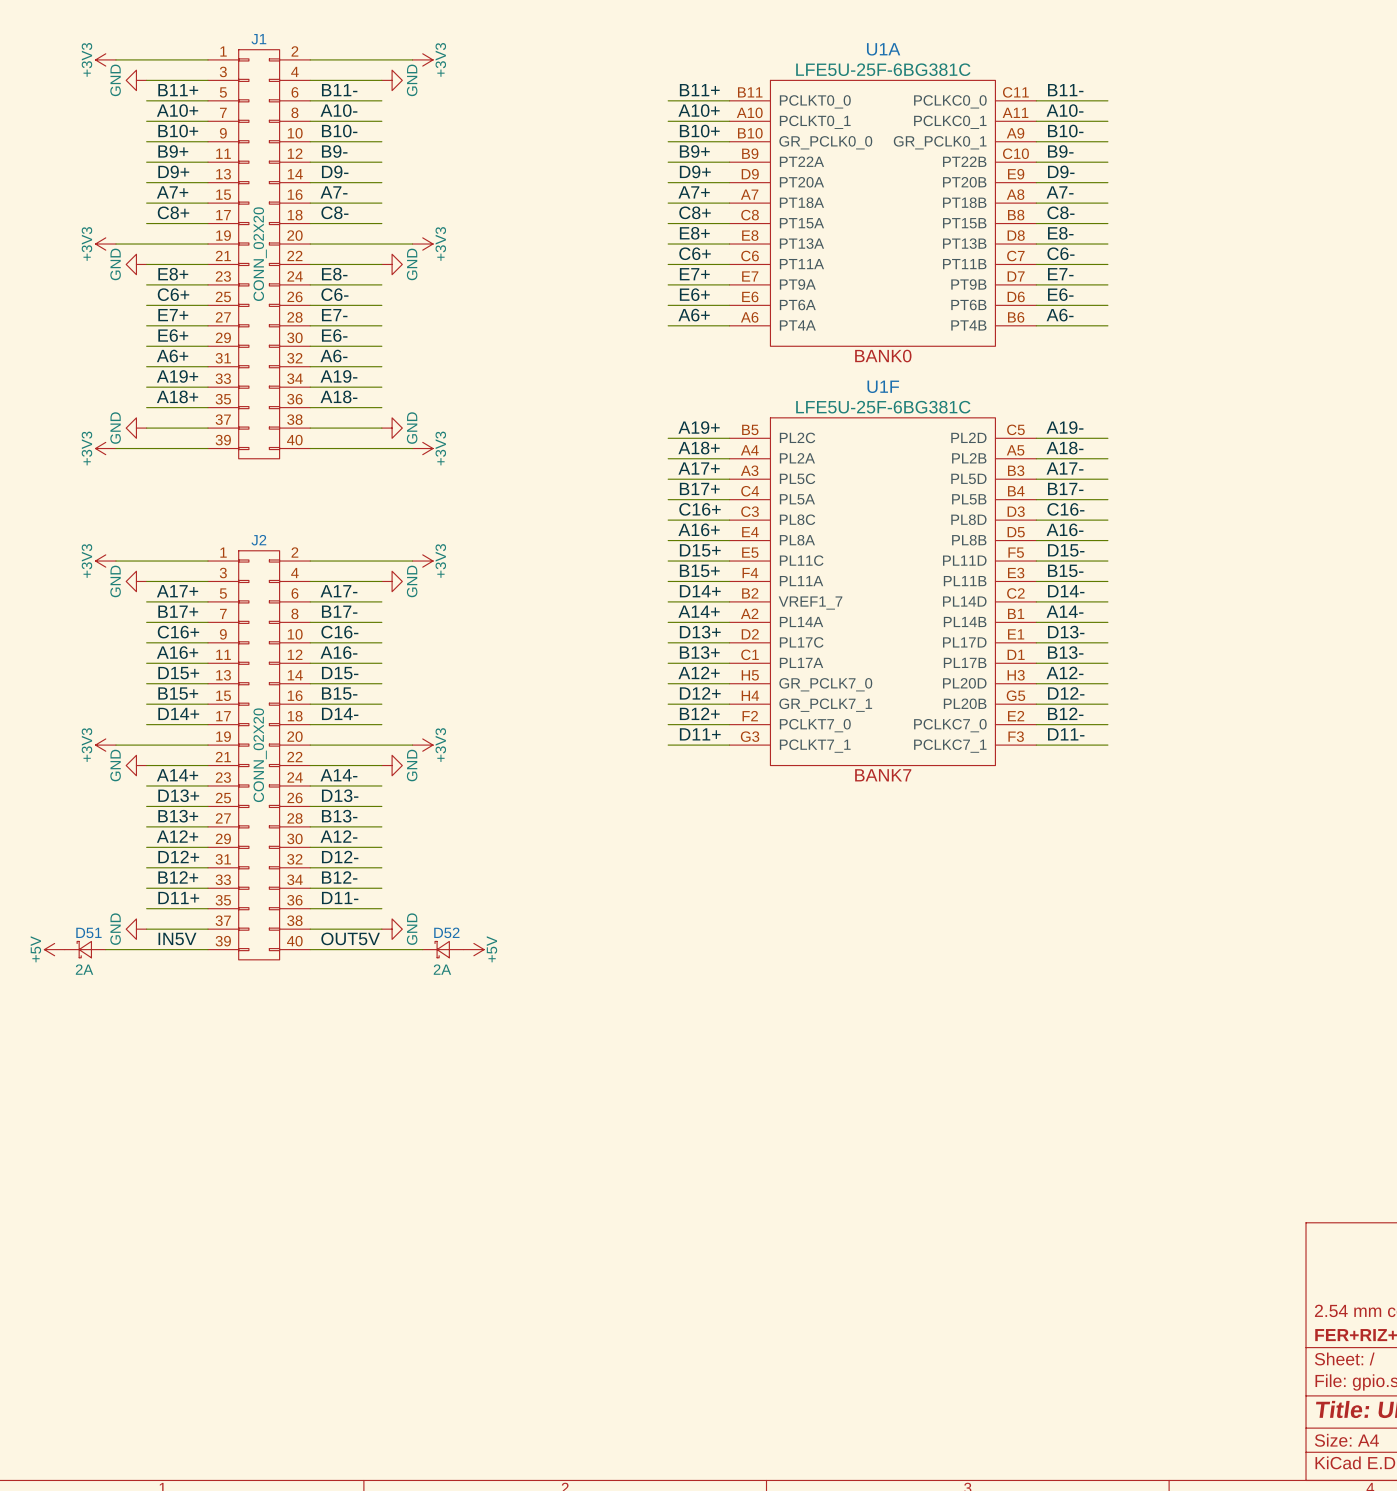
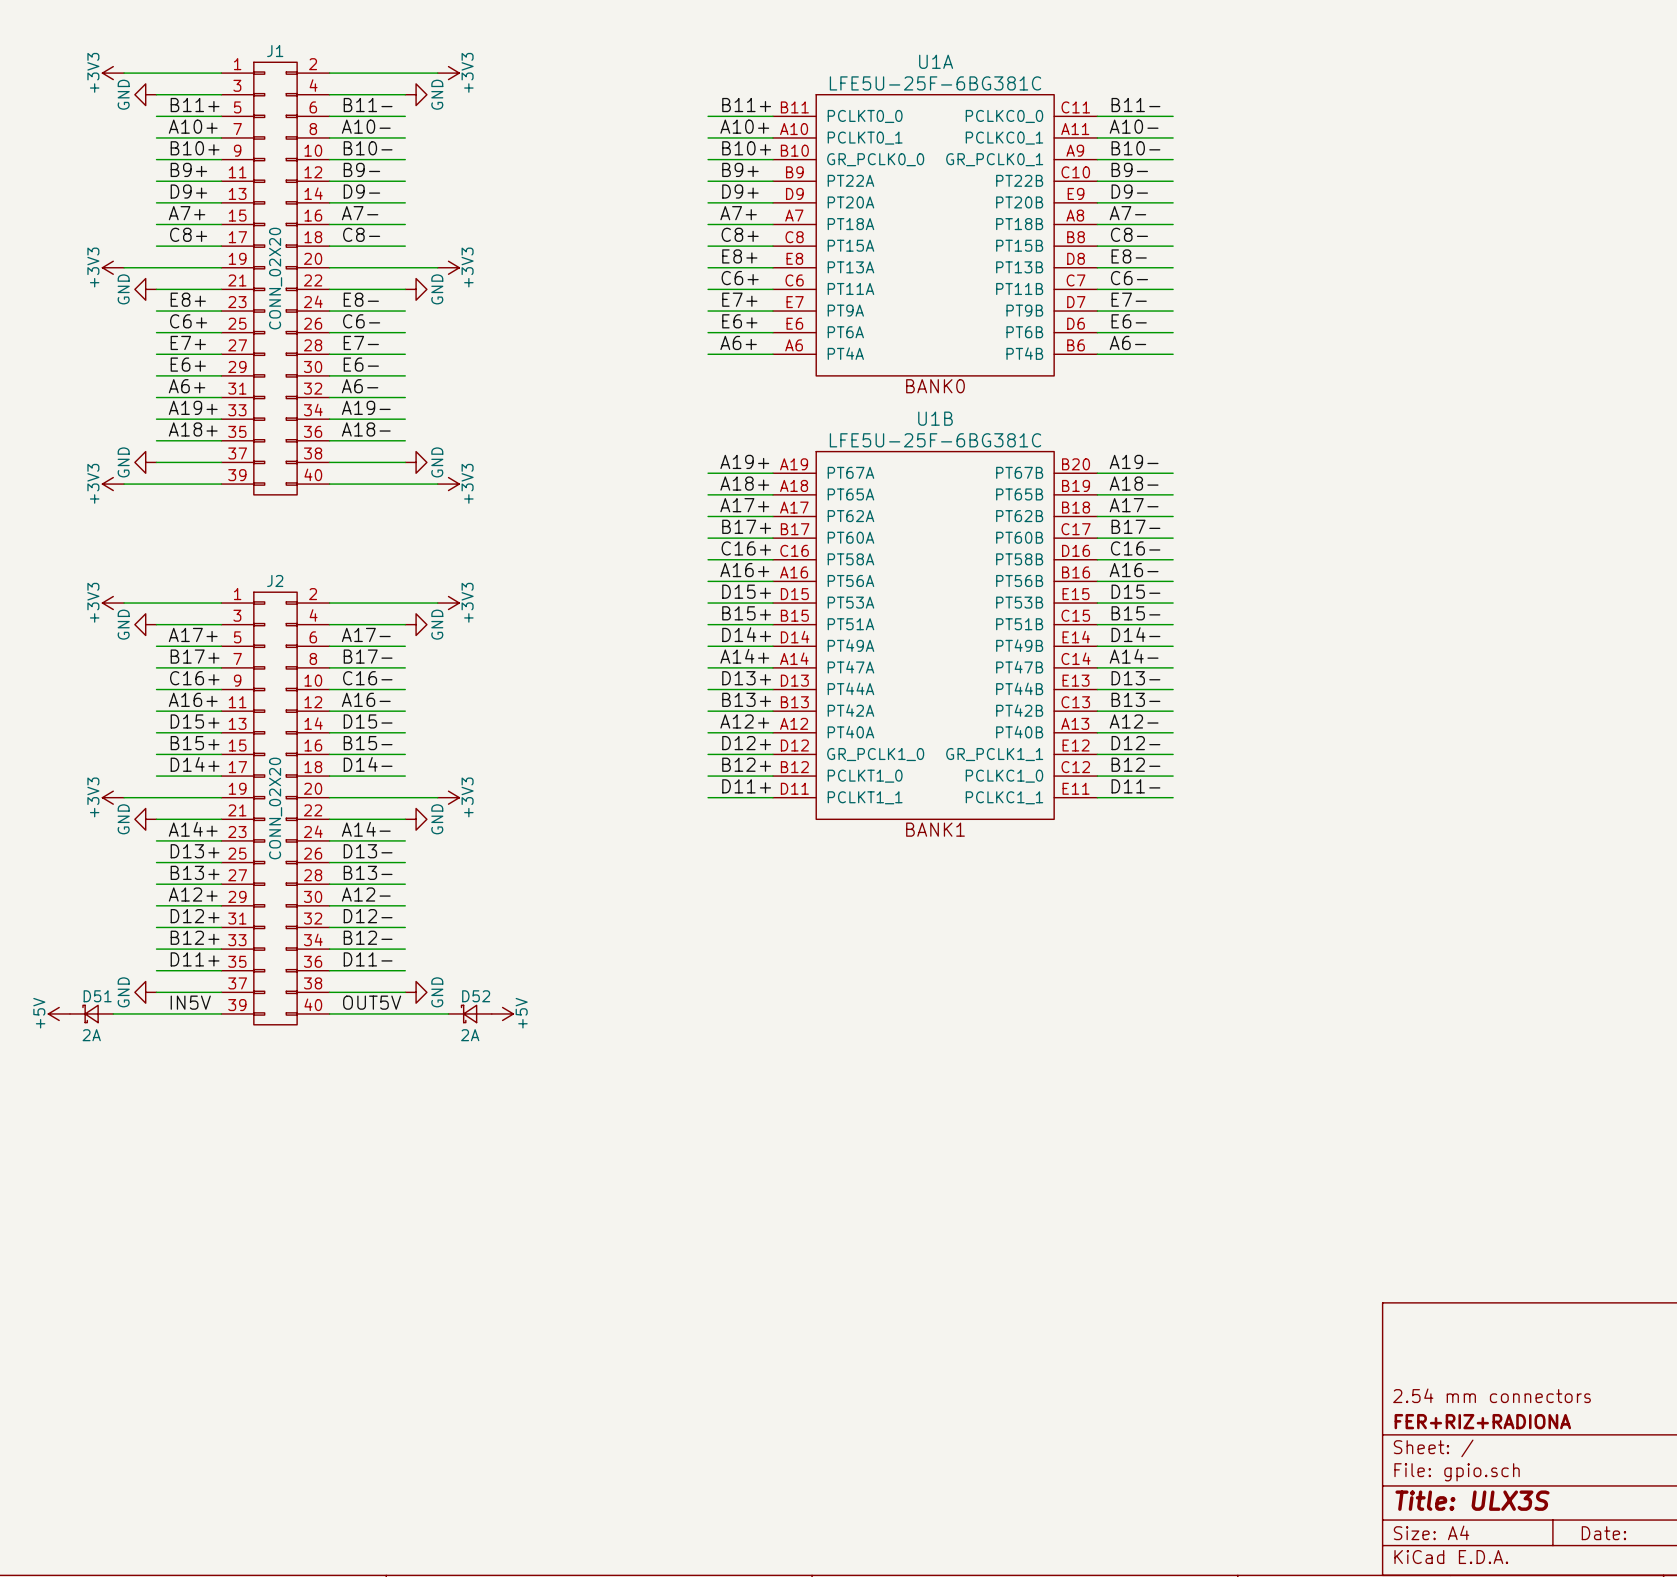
U1F name: U1F (883, 386) -> U1B (935, 418)
U1F symbol: [729, 417, 1037, 766] -> [772, 451, 1098, 820]

